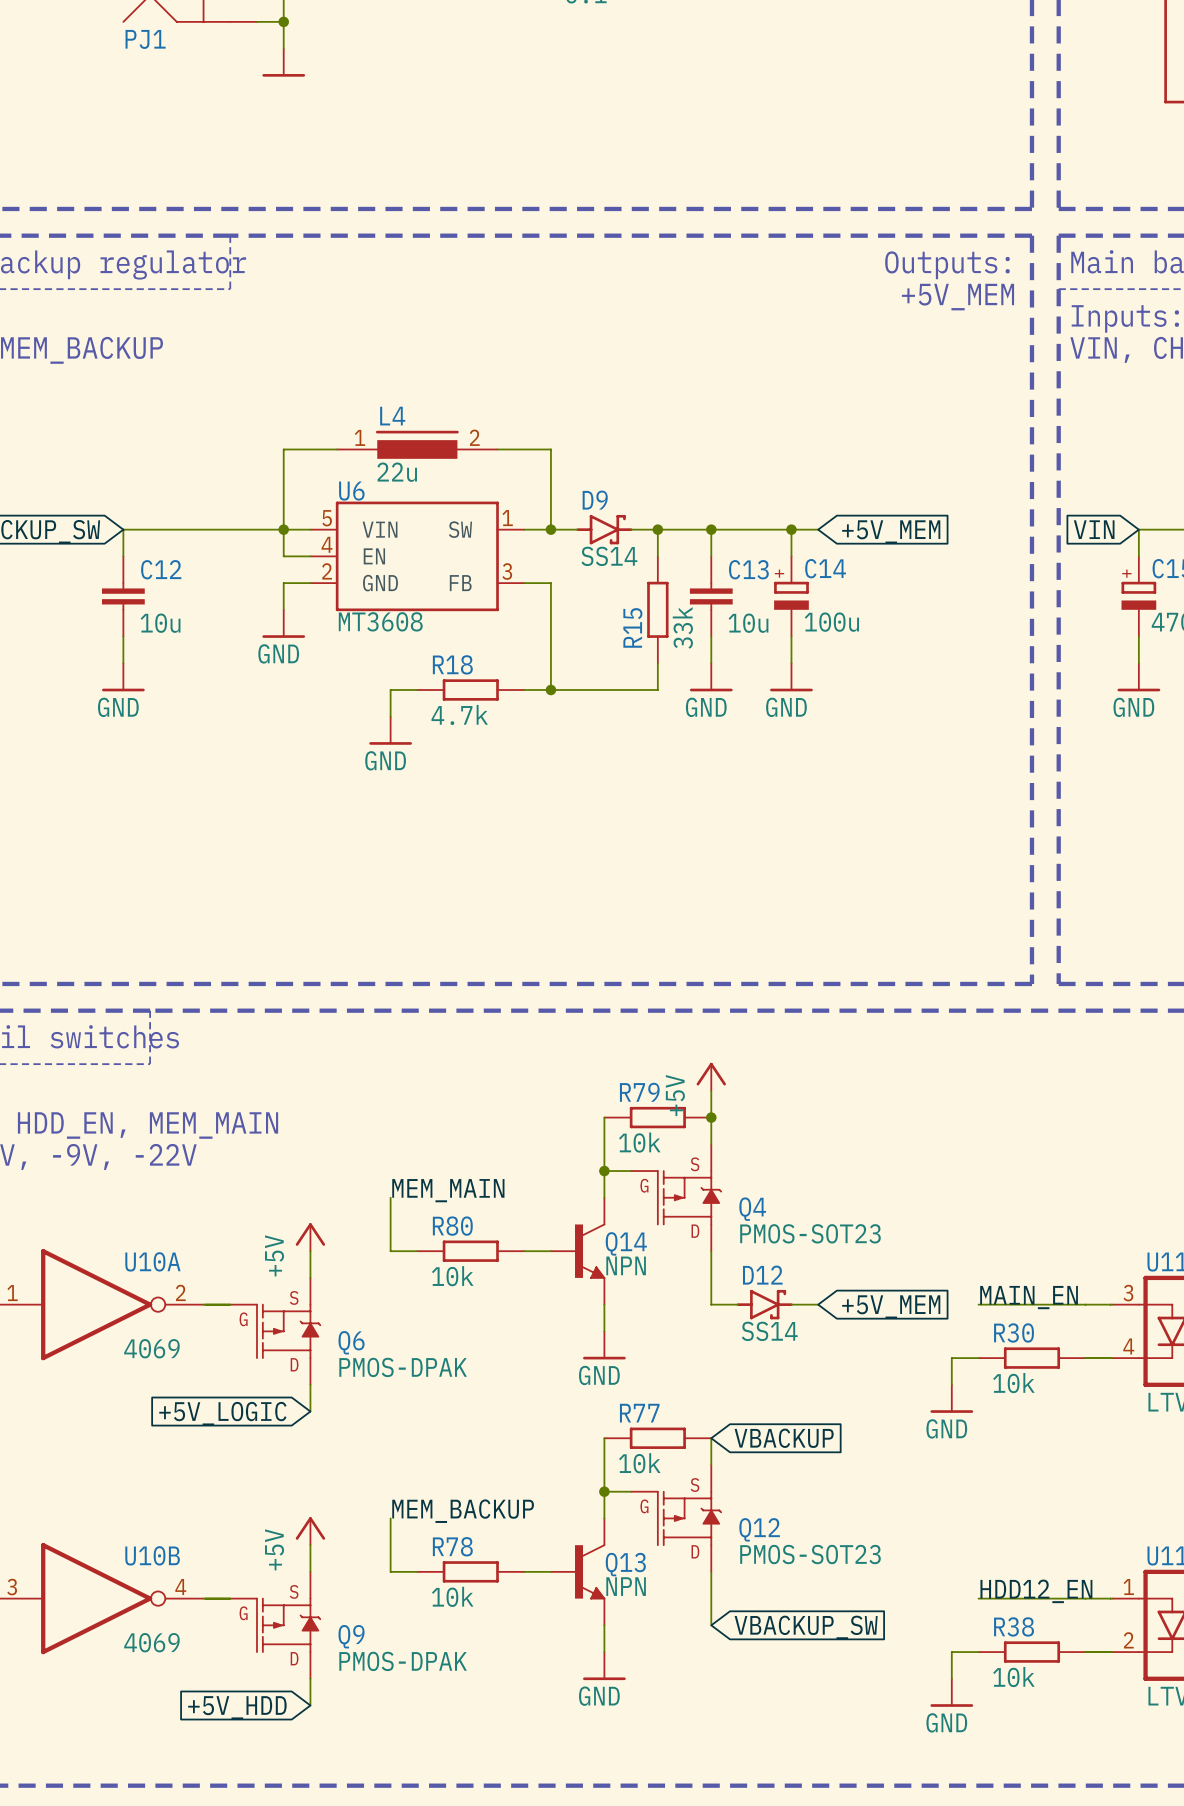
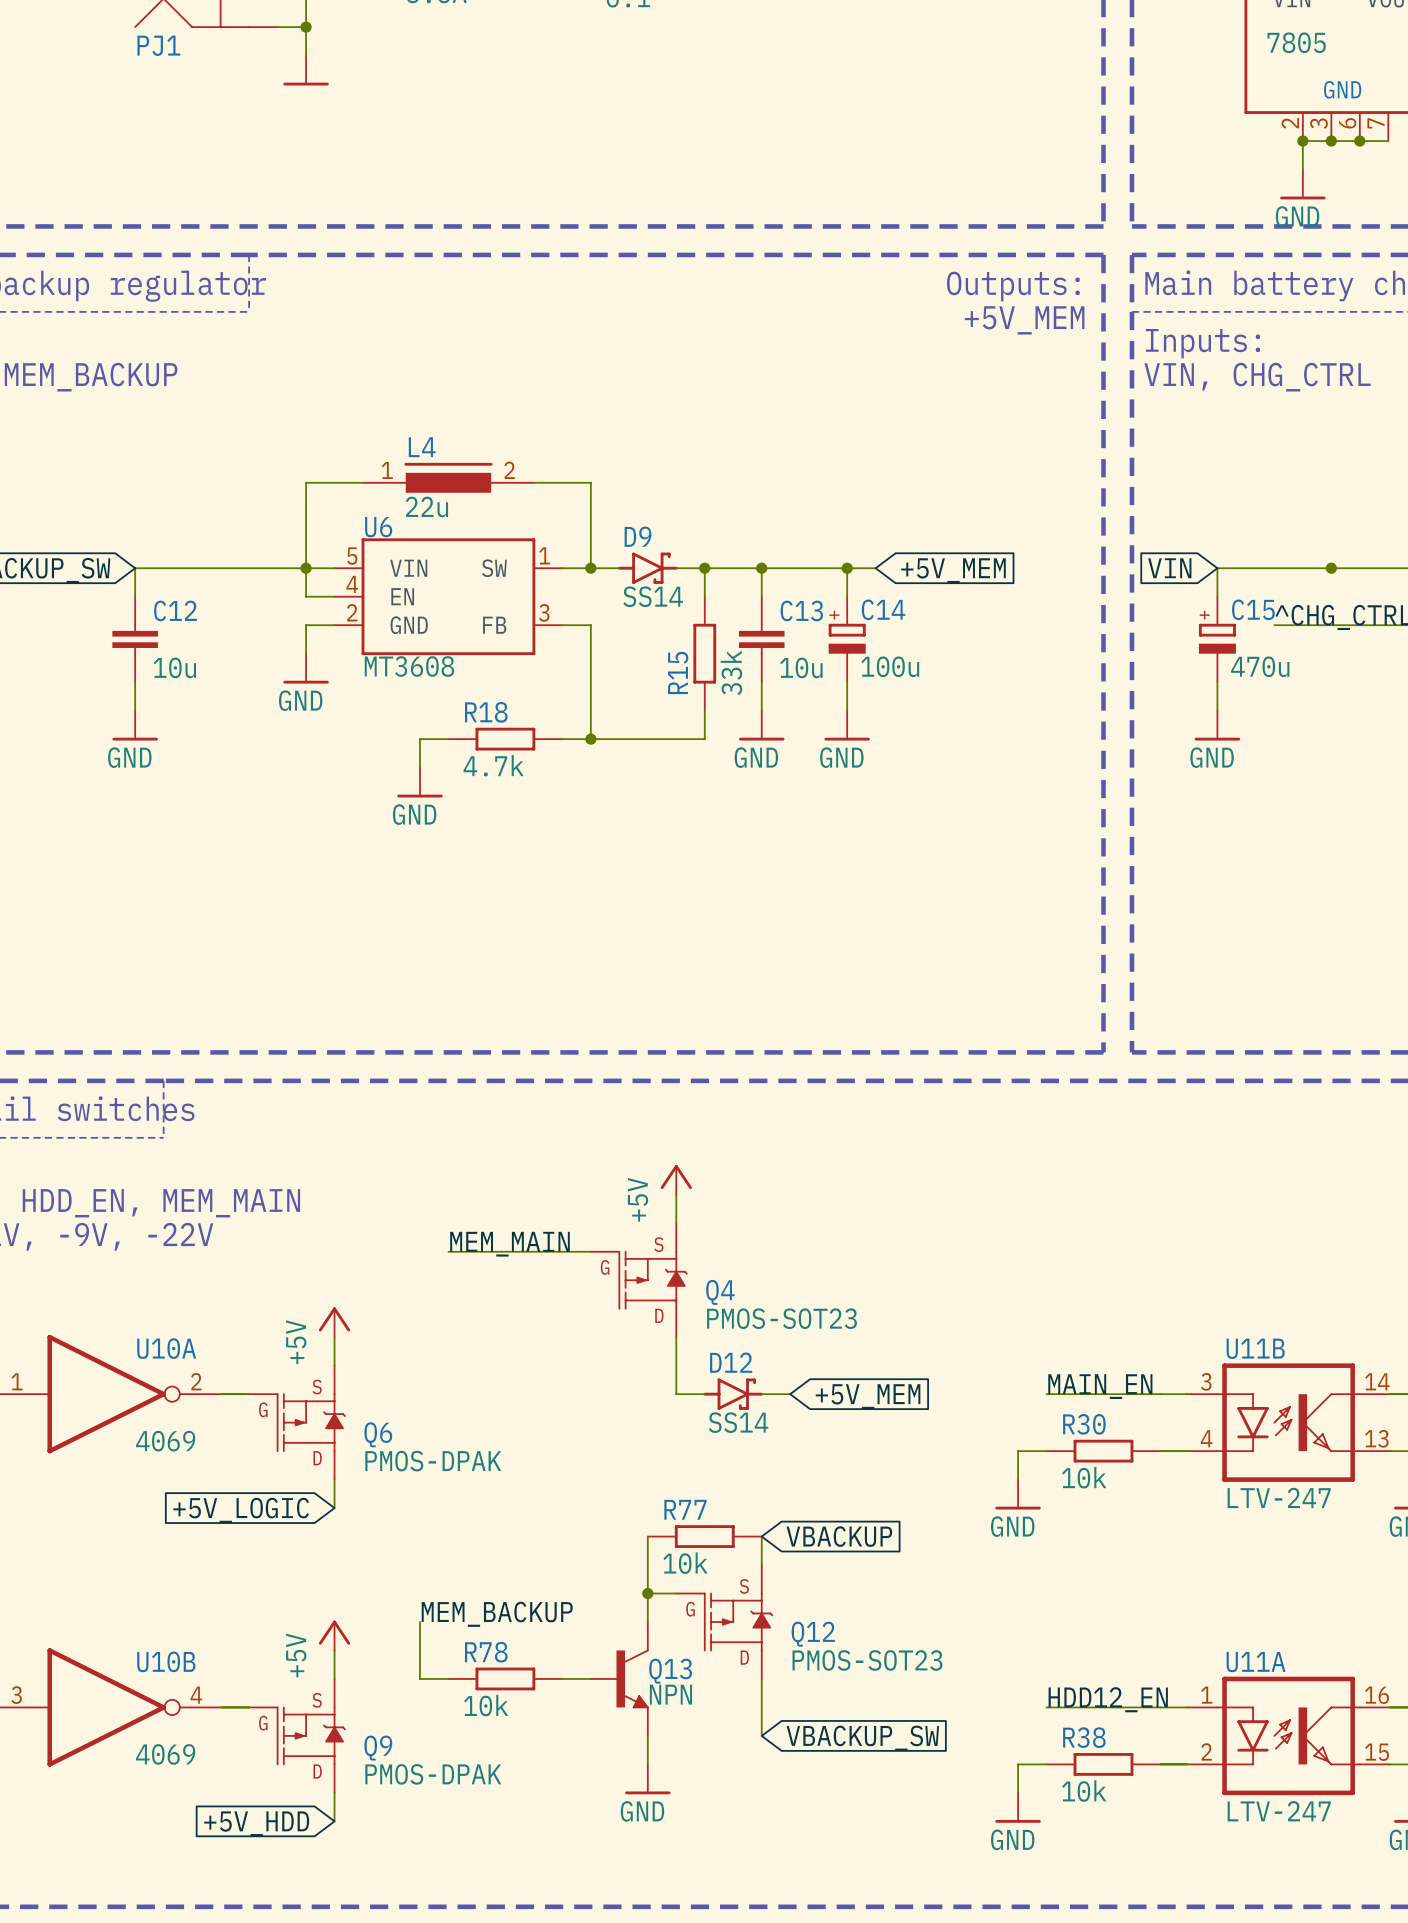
power symbol position: +5V (711, 1076) -> +5V (676, 1179)
wire: (711, 1090) (711, 1144) -> none
wire: (604, 1117) (604, 1197) -> none
R79: 10k (657, 1117) -> none
junction: (711, 1117) -> none
wire: none -> (448, 1251) (590, 1251)
wire: (604, 1171) (631, 1171) -> none
junction: (604, 1171) -> none
label position: MEM_MAIN (448, 1190) -> MEM_MAIN (509, 1244)
wire: (390, 1197) (390, 1251) (417, 1251) -> (676, 1337) (676, 1394) (704, 1394)
Q4 position: (676, 1197) -> (639, 1280)
R80: 10k (470, 1251) -> none
wire: (524, 1251) (550, 1251) -> none
Q14: NPN (578, 1251) -> none
wire: (711, 1251) (711, 1304) -> none
wire: (604, 1304) (604, 1331) -> (676, 1194) (676, 1223)
D12 position: (764, 1304) -> (733, 1394)
wire: (791, 1304) (818, 1304) -> none
global label position: +5V_MEM (891, 1306) -> +5V_MEM (868, 1396)
power symbol: GND (604, 1345) -> none

